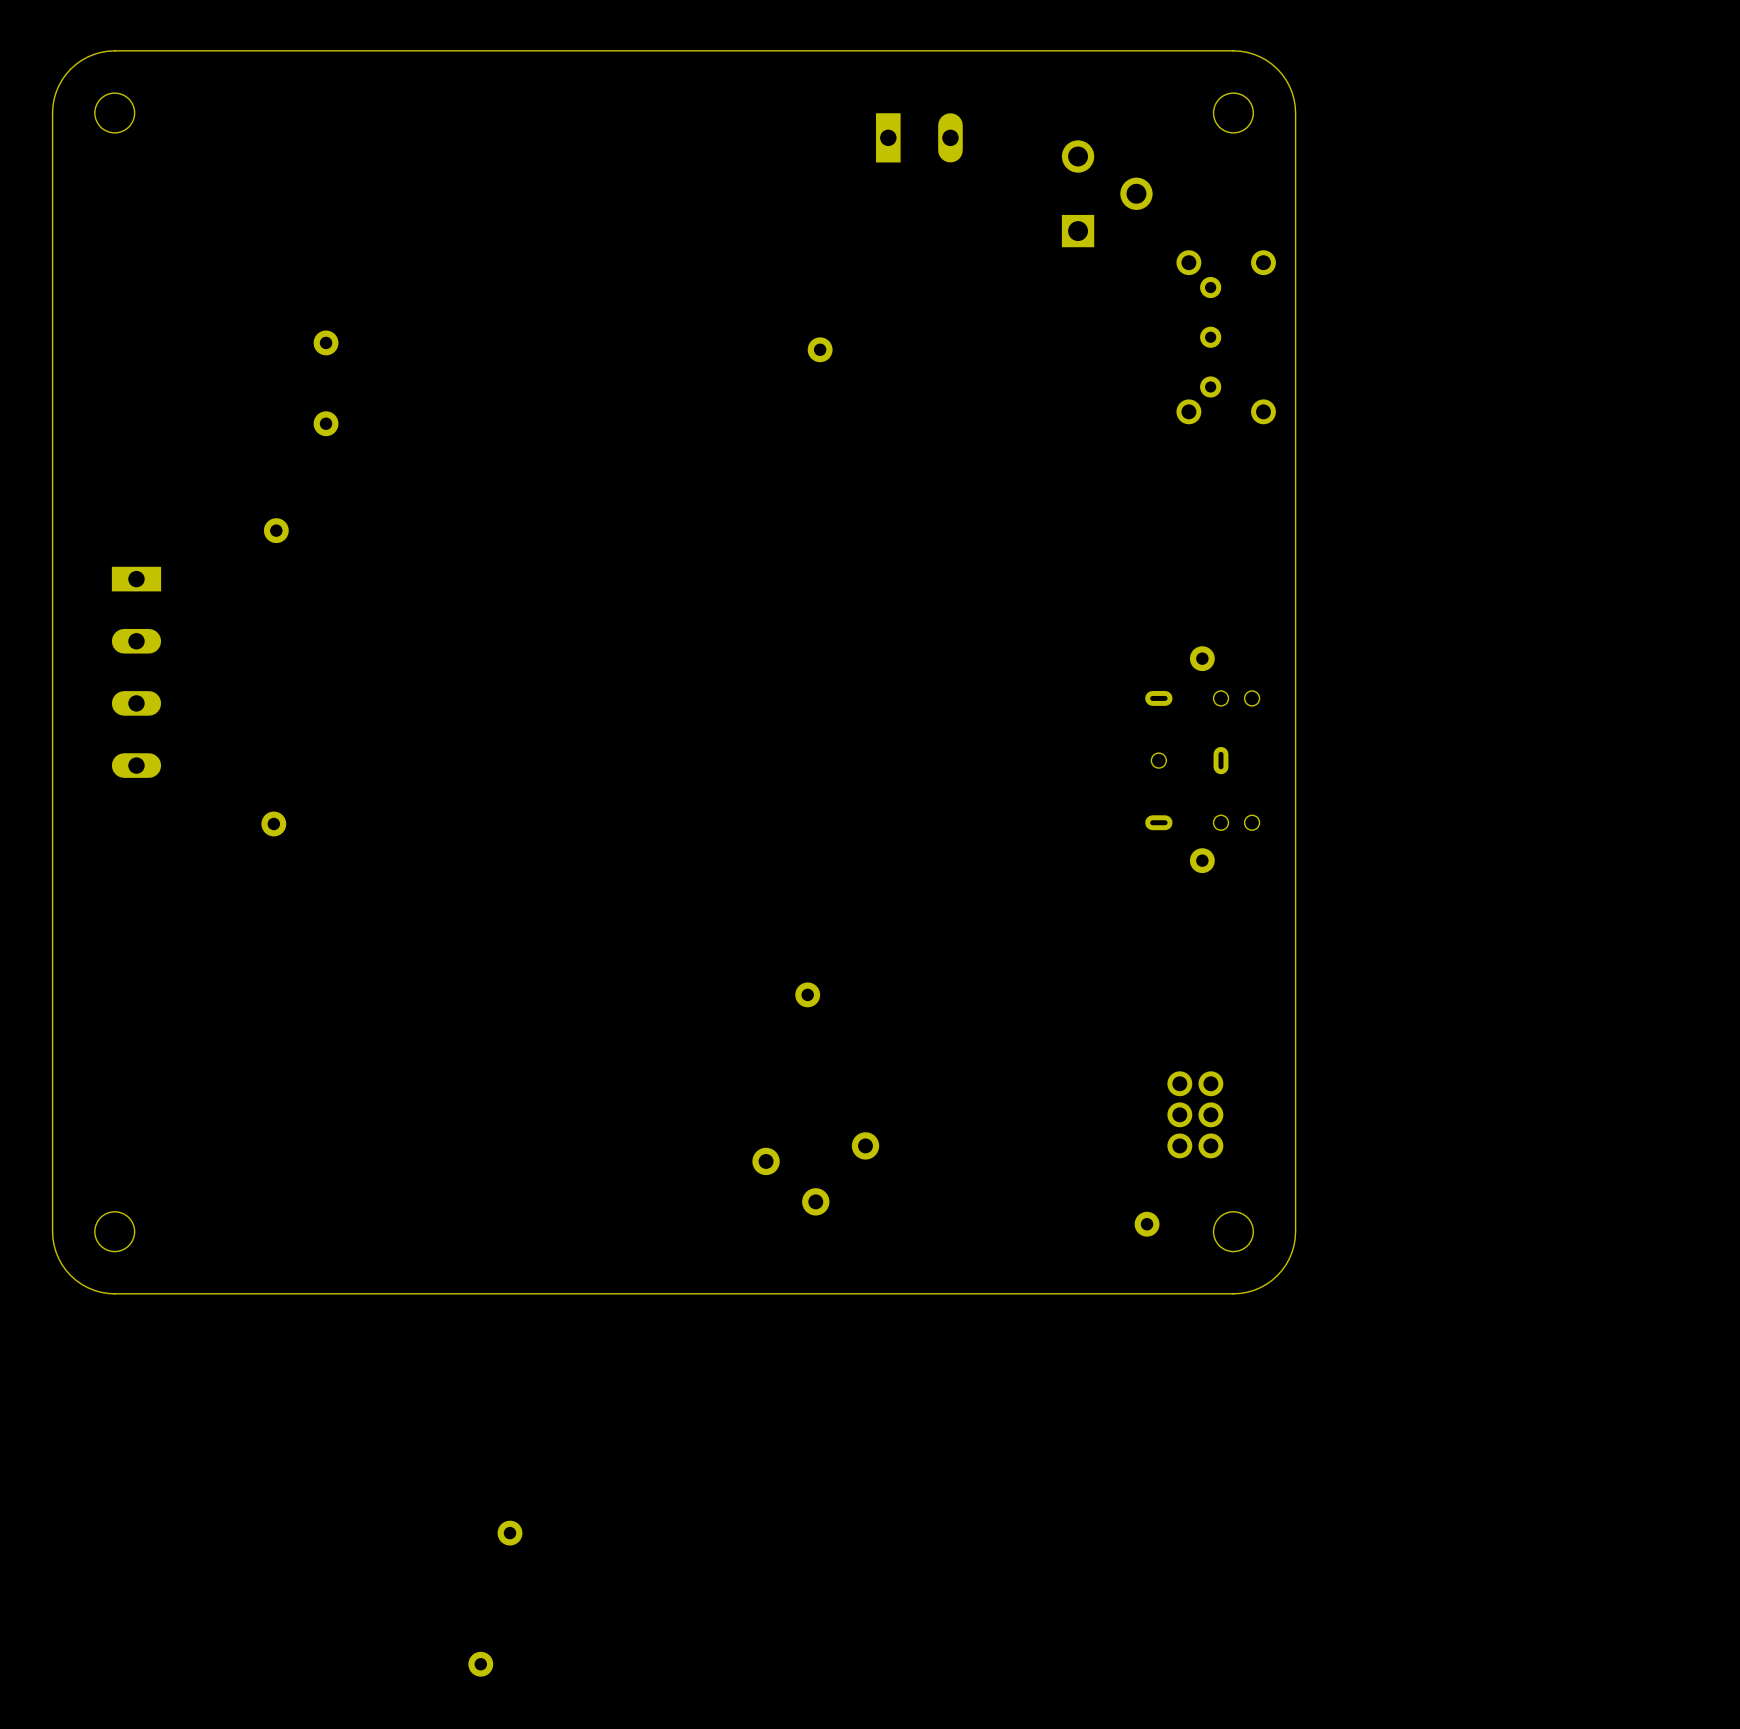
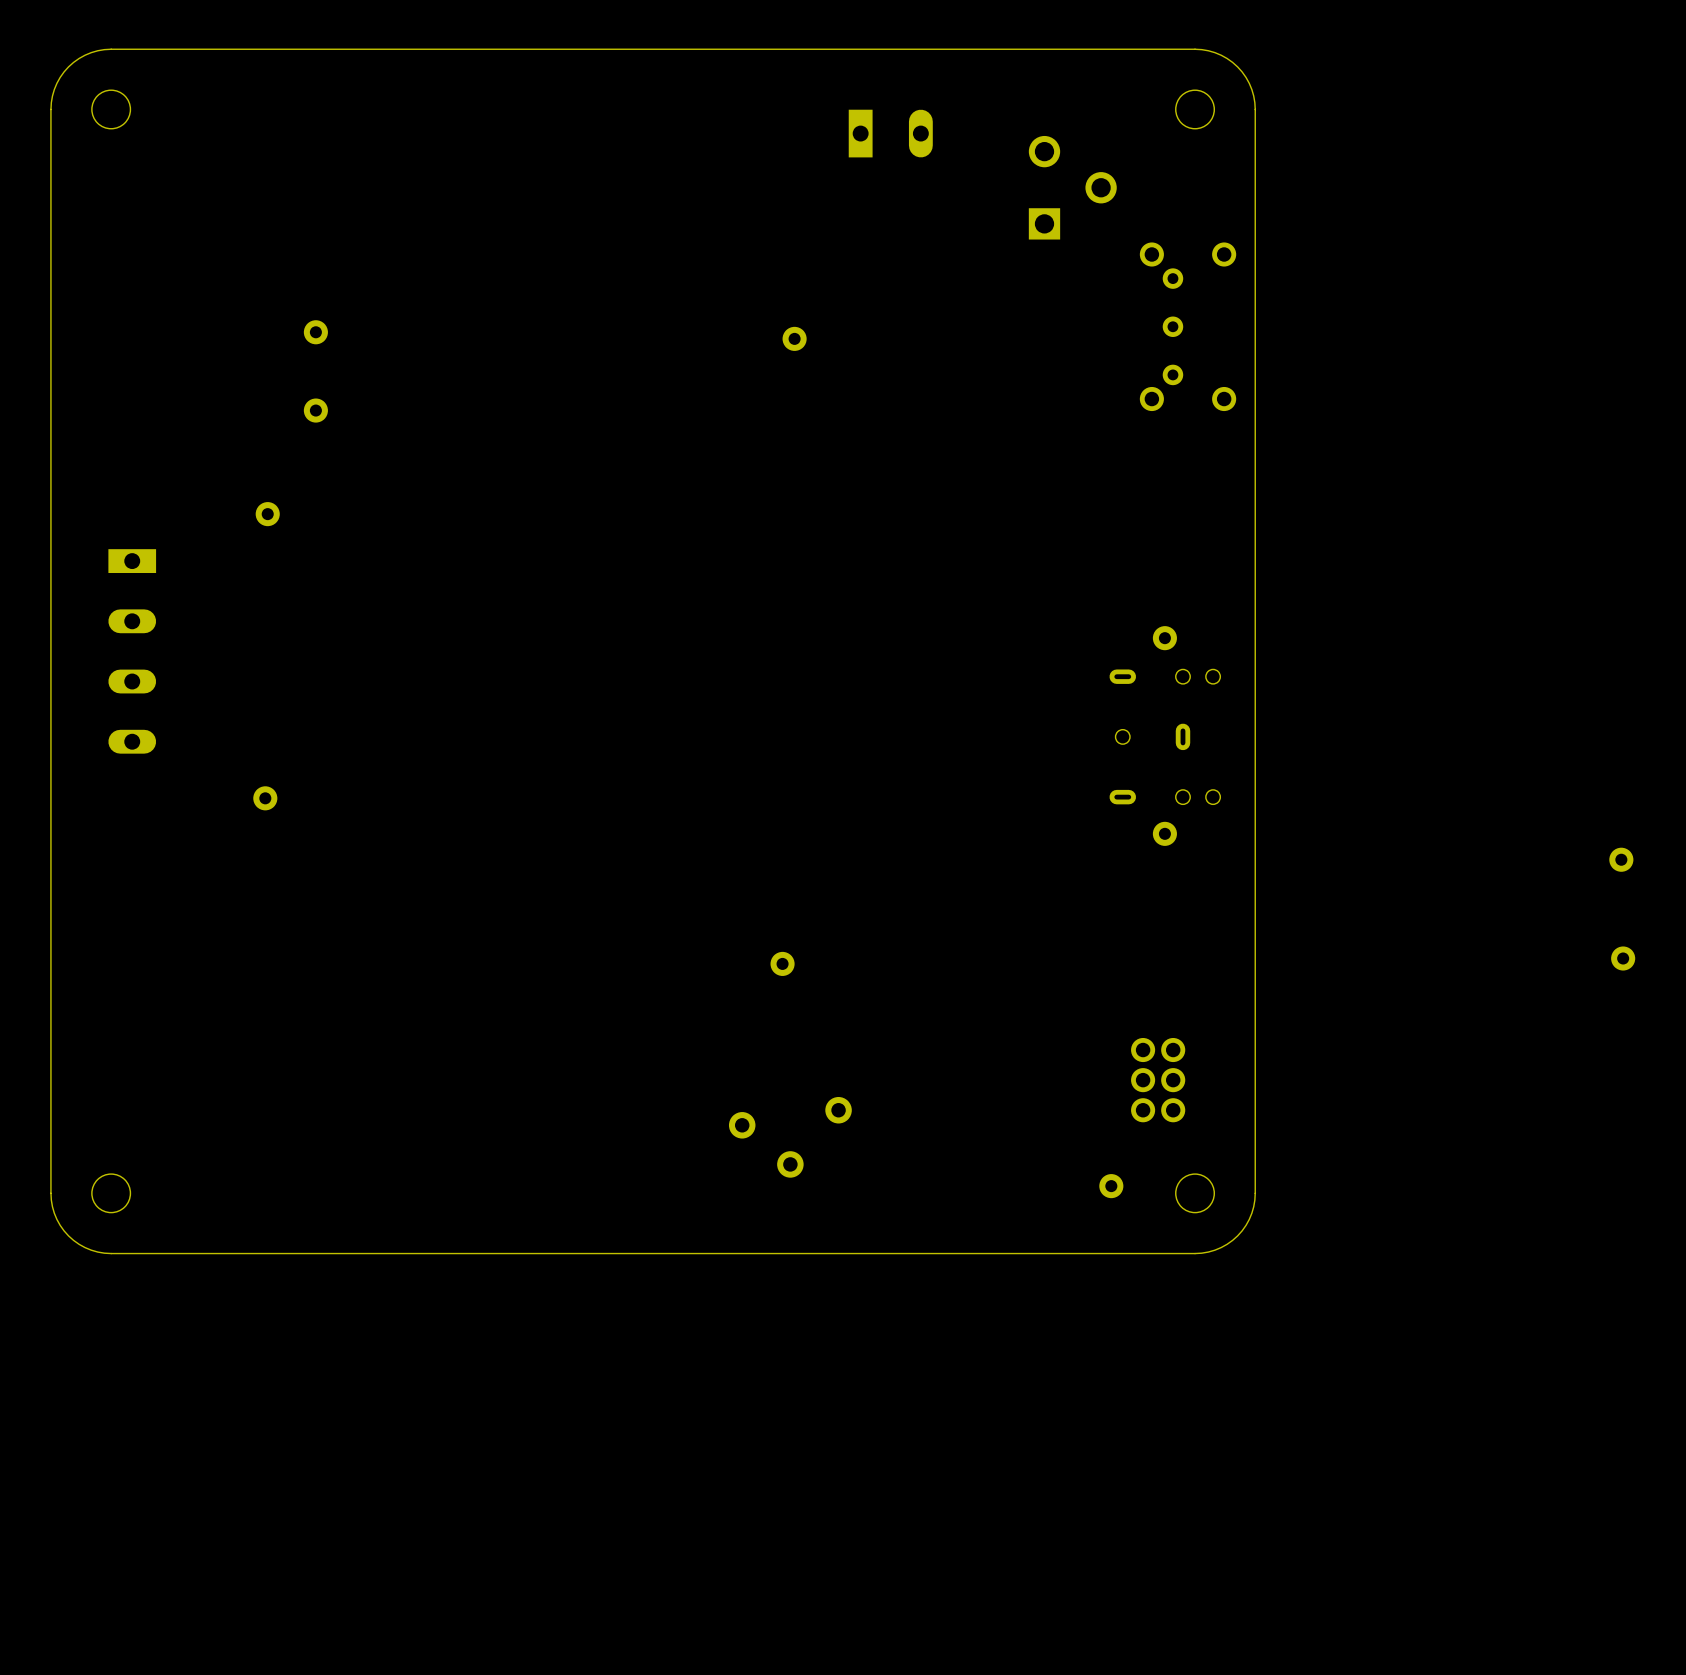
part: none -> (1621, 859)
part: none -> (1623, 958)
part: (510, 1533) -> none
part: (480, 1664) -> none

